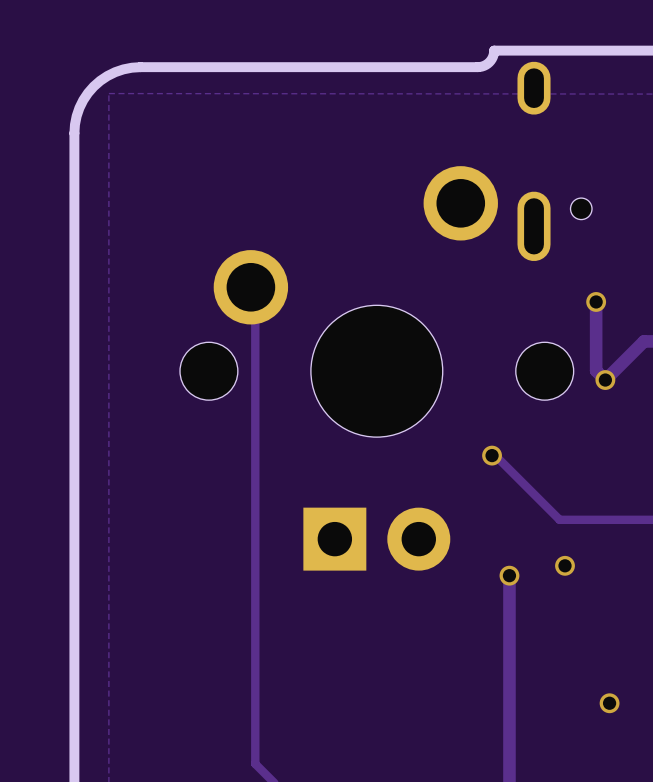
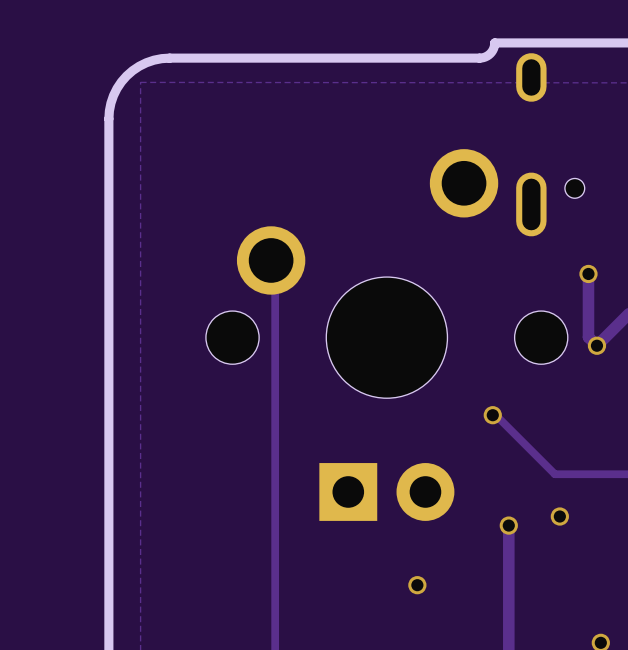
via: none -> (417, 585)

